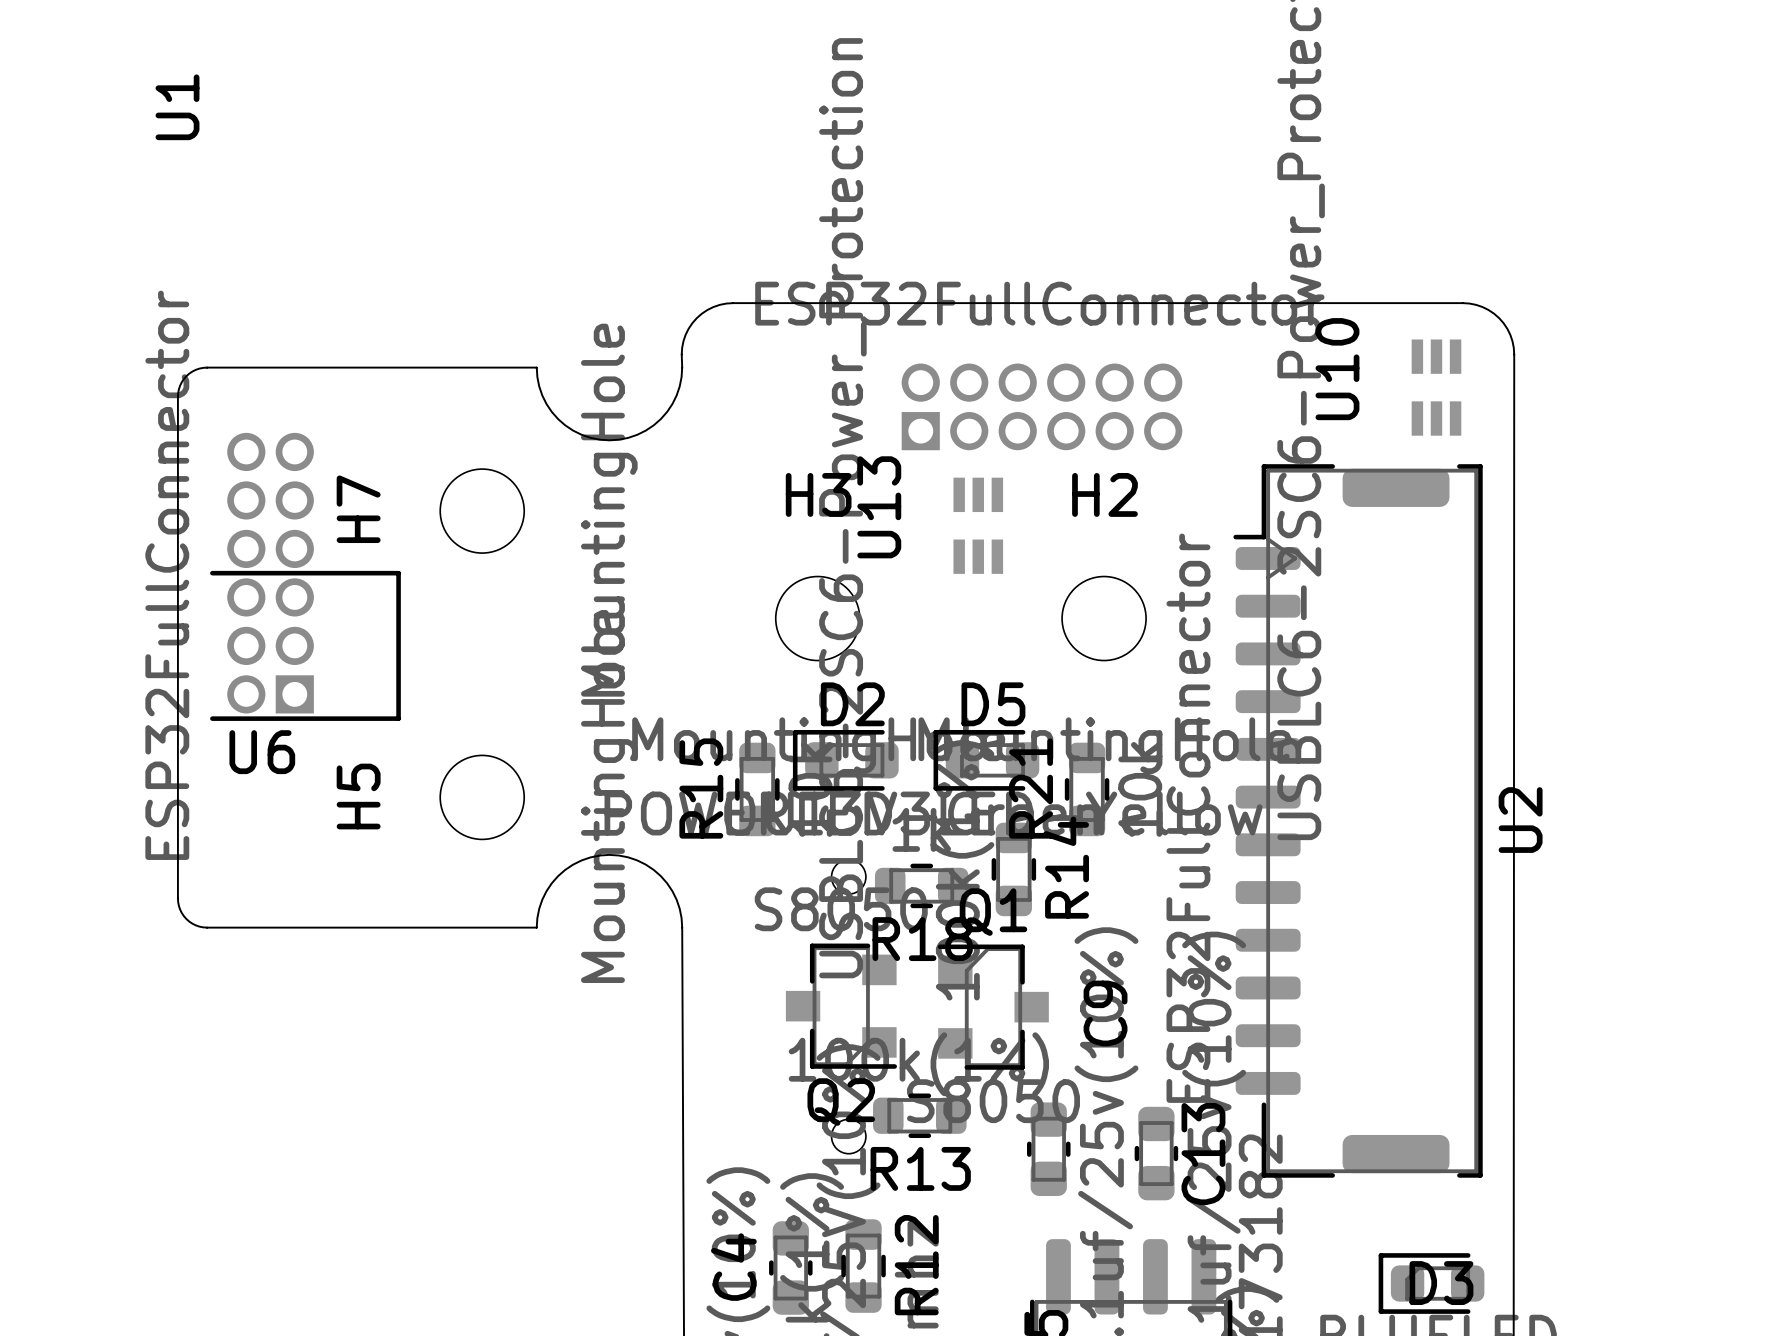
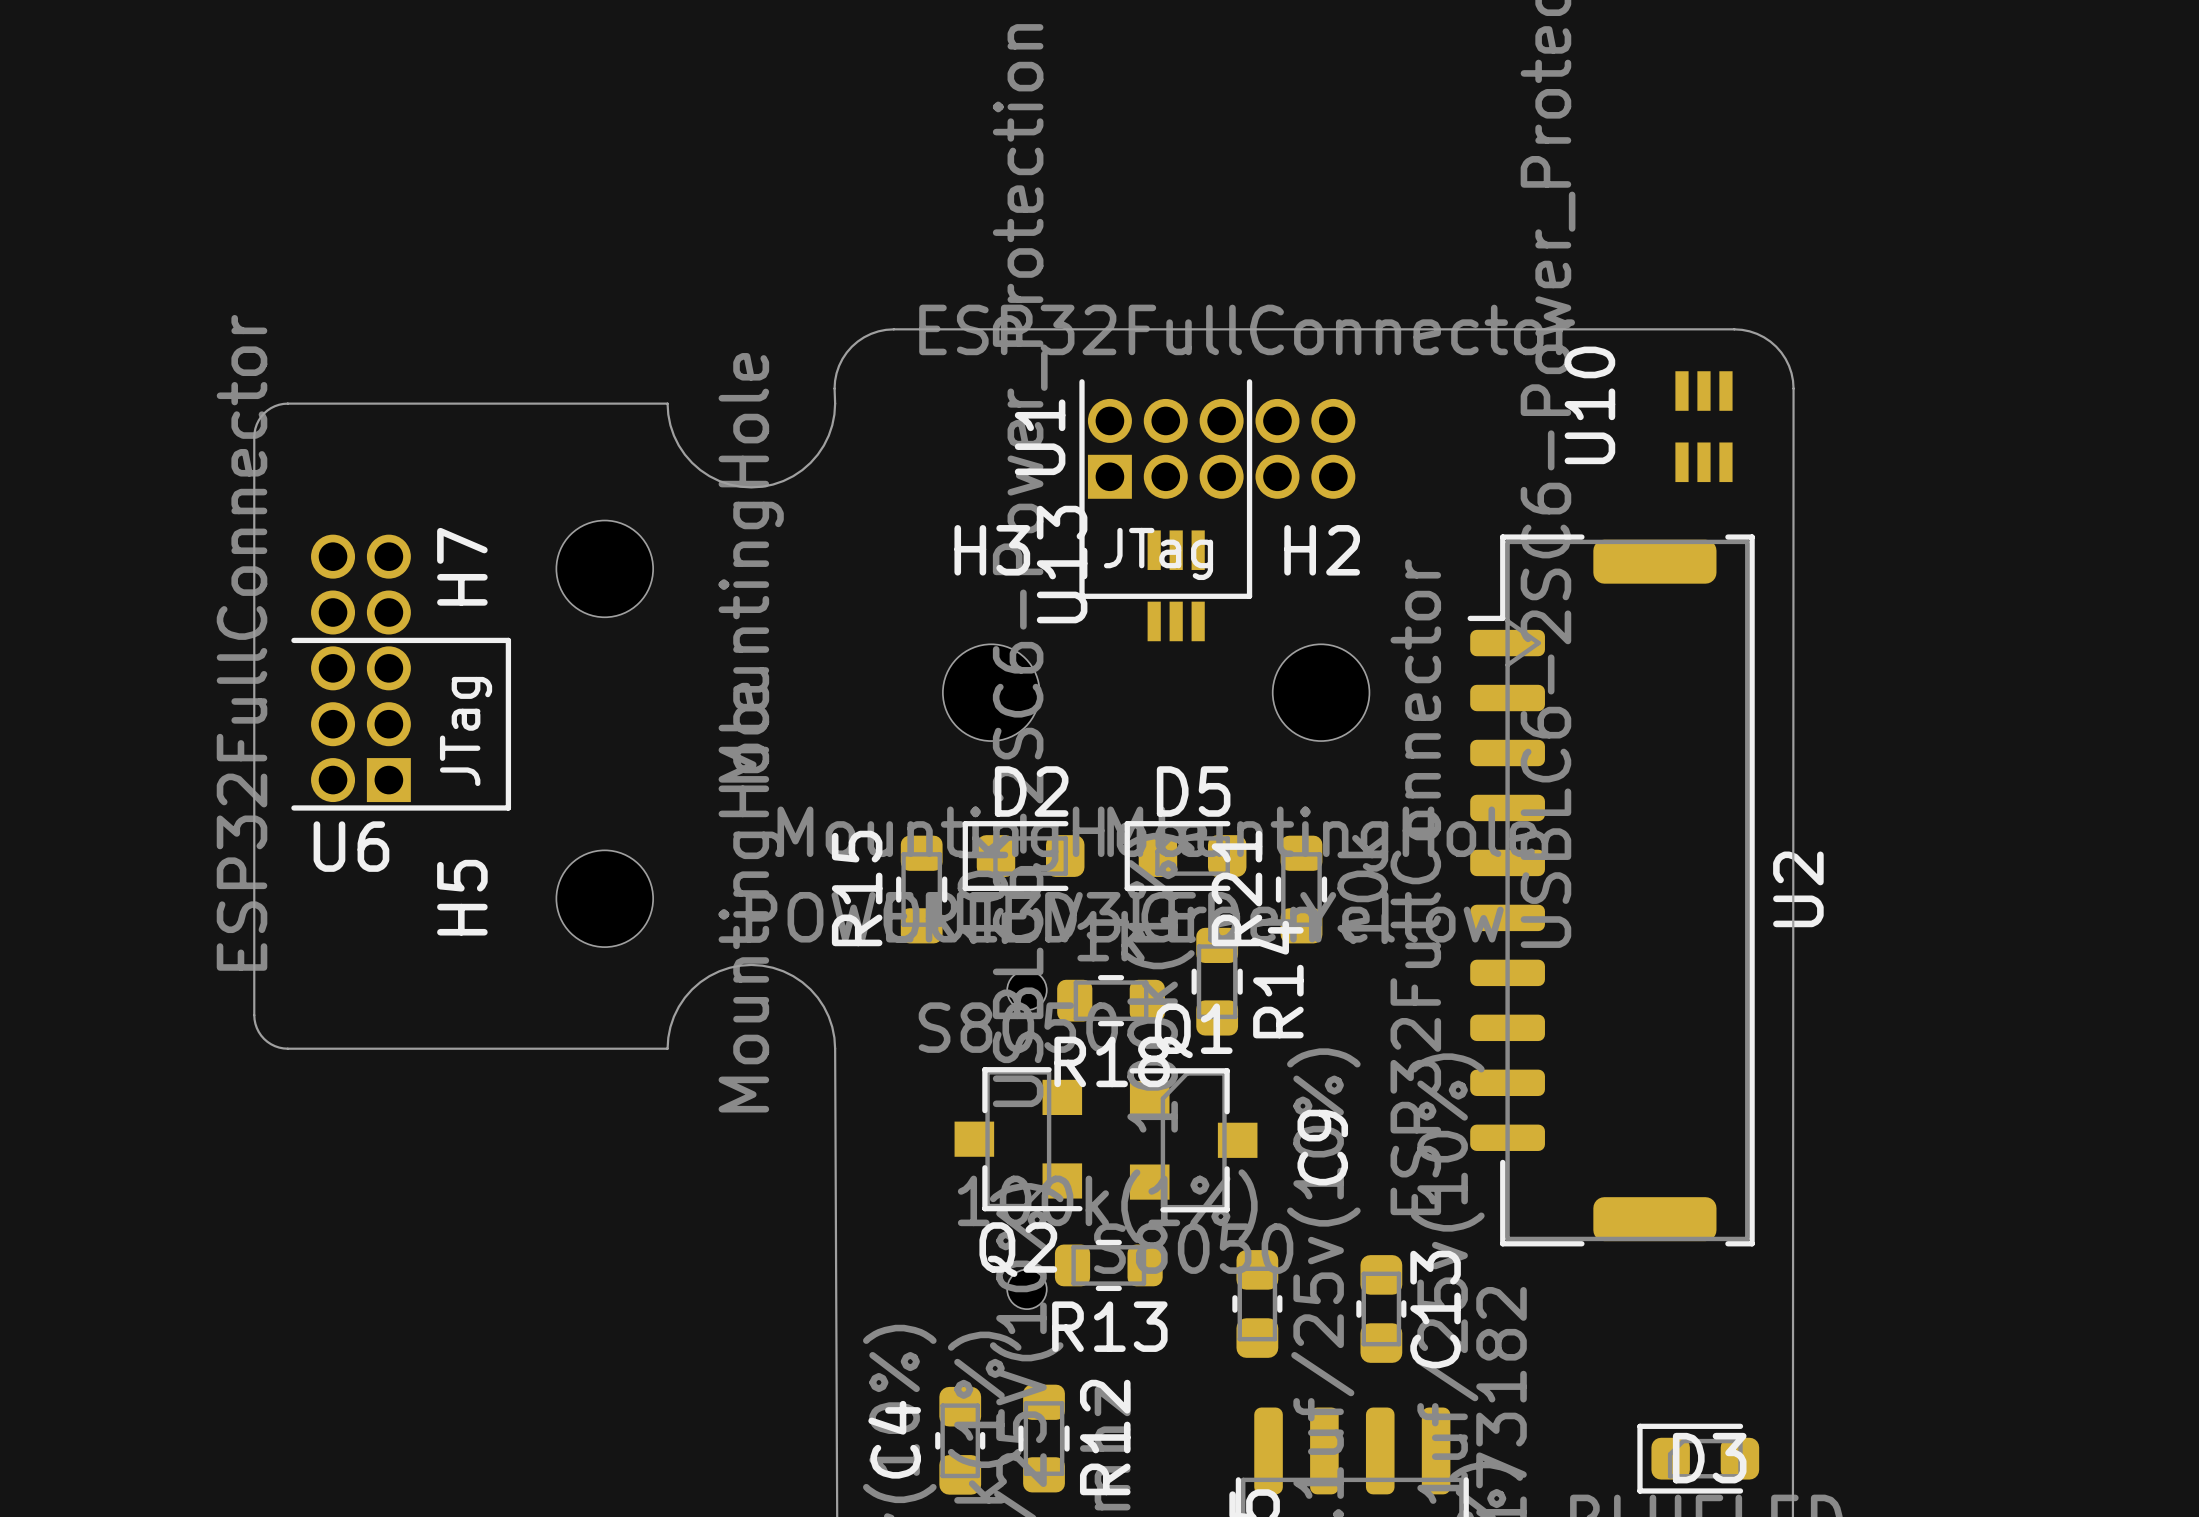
U1 name position: U1 (177, 107) -> U1 (1040, 437)
U1 footprint: [901, 363, 1183, 451] -> [1079, 379, 1356, 599]
U6 footprint: [210, 432, 401, 721] -> [291, 534, 512, 811]
U2 footprint: [1233, 464, 1483, 1178] -> [1467, 534, 1755, 1247]

